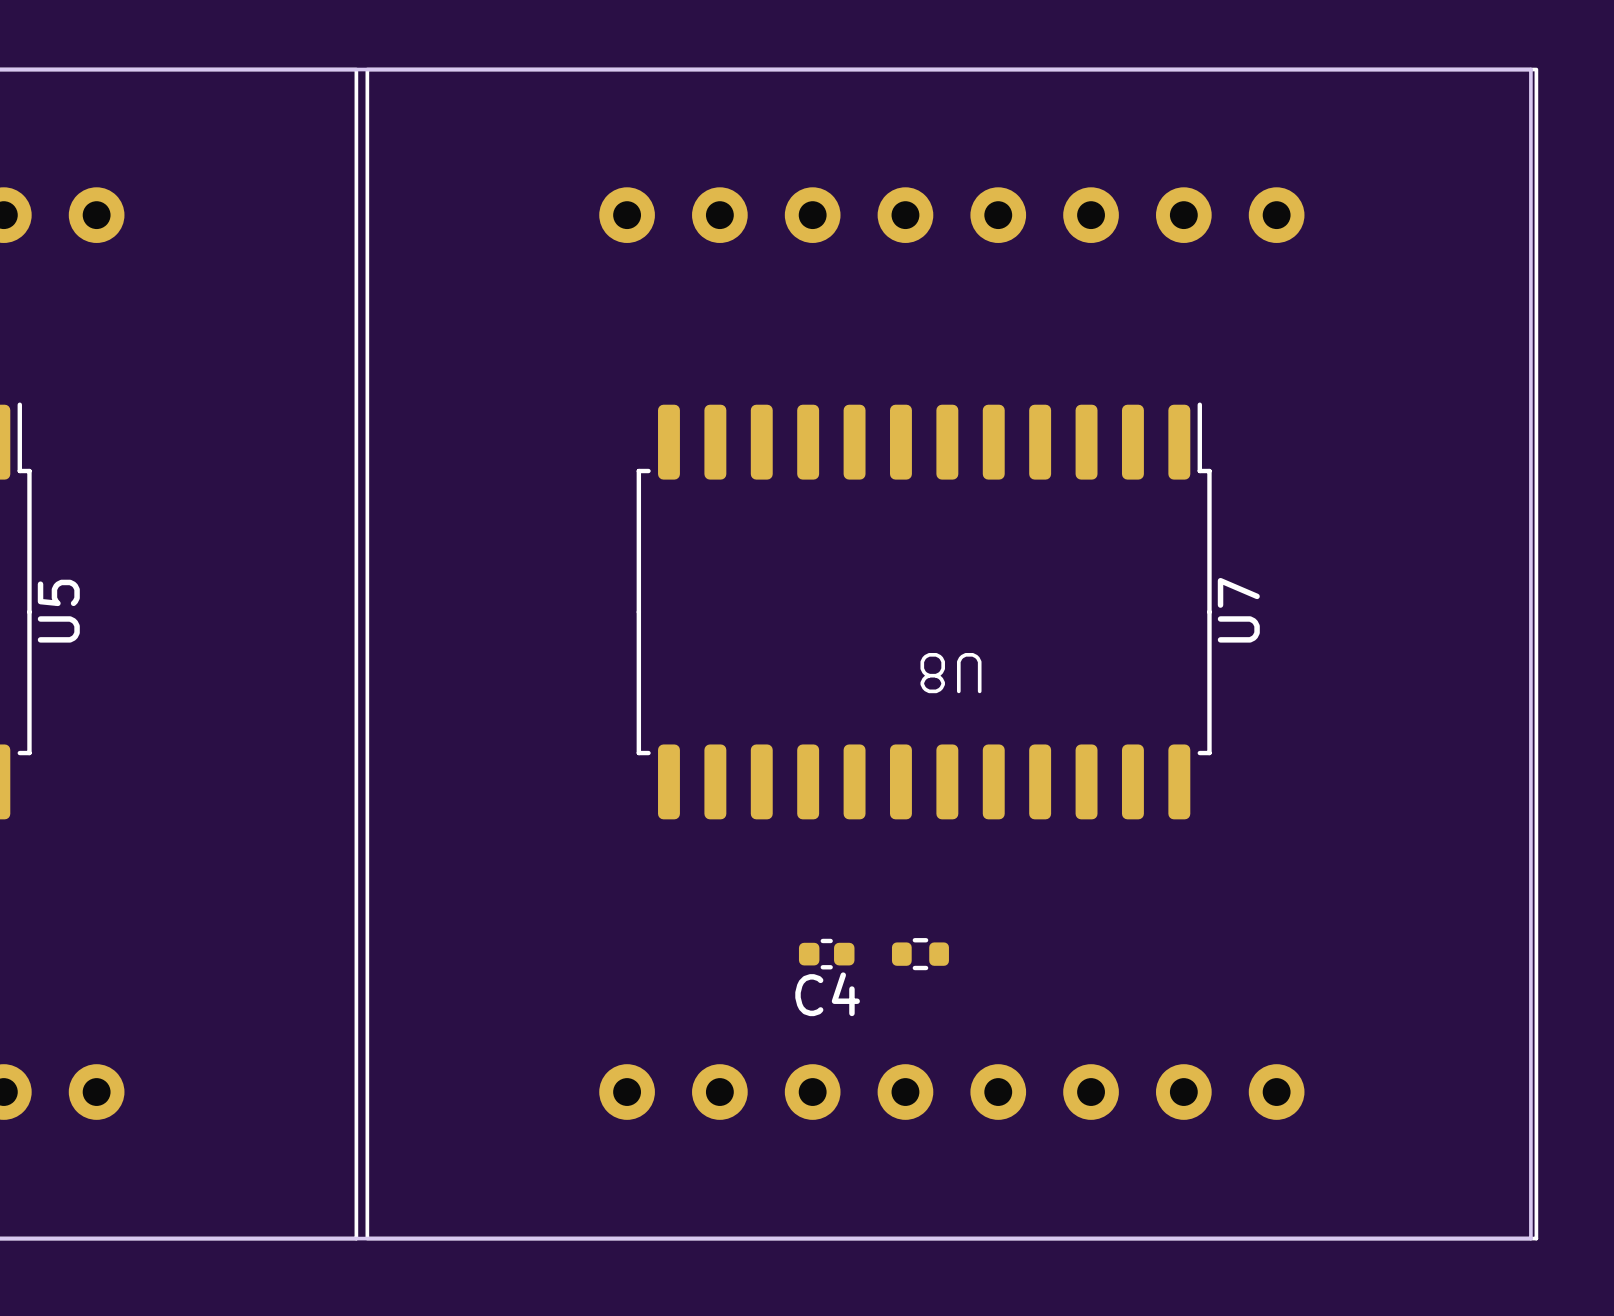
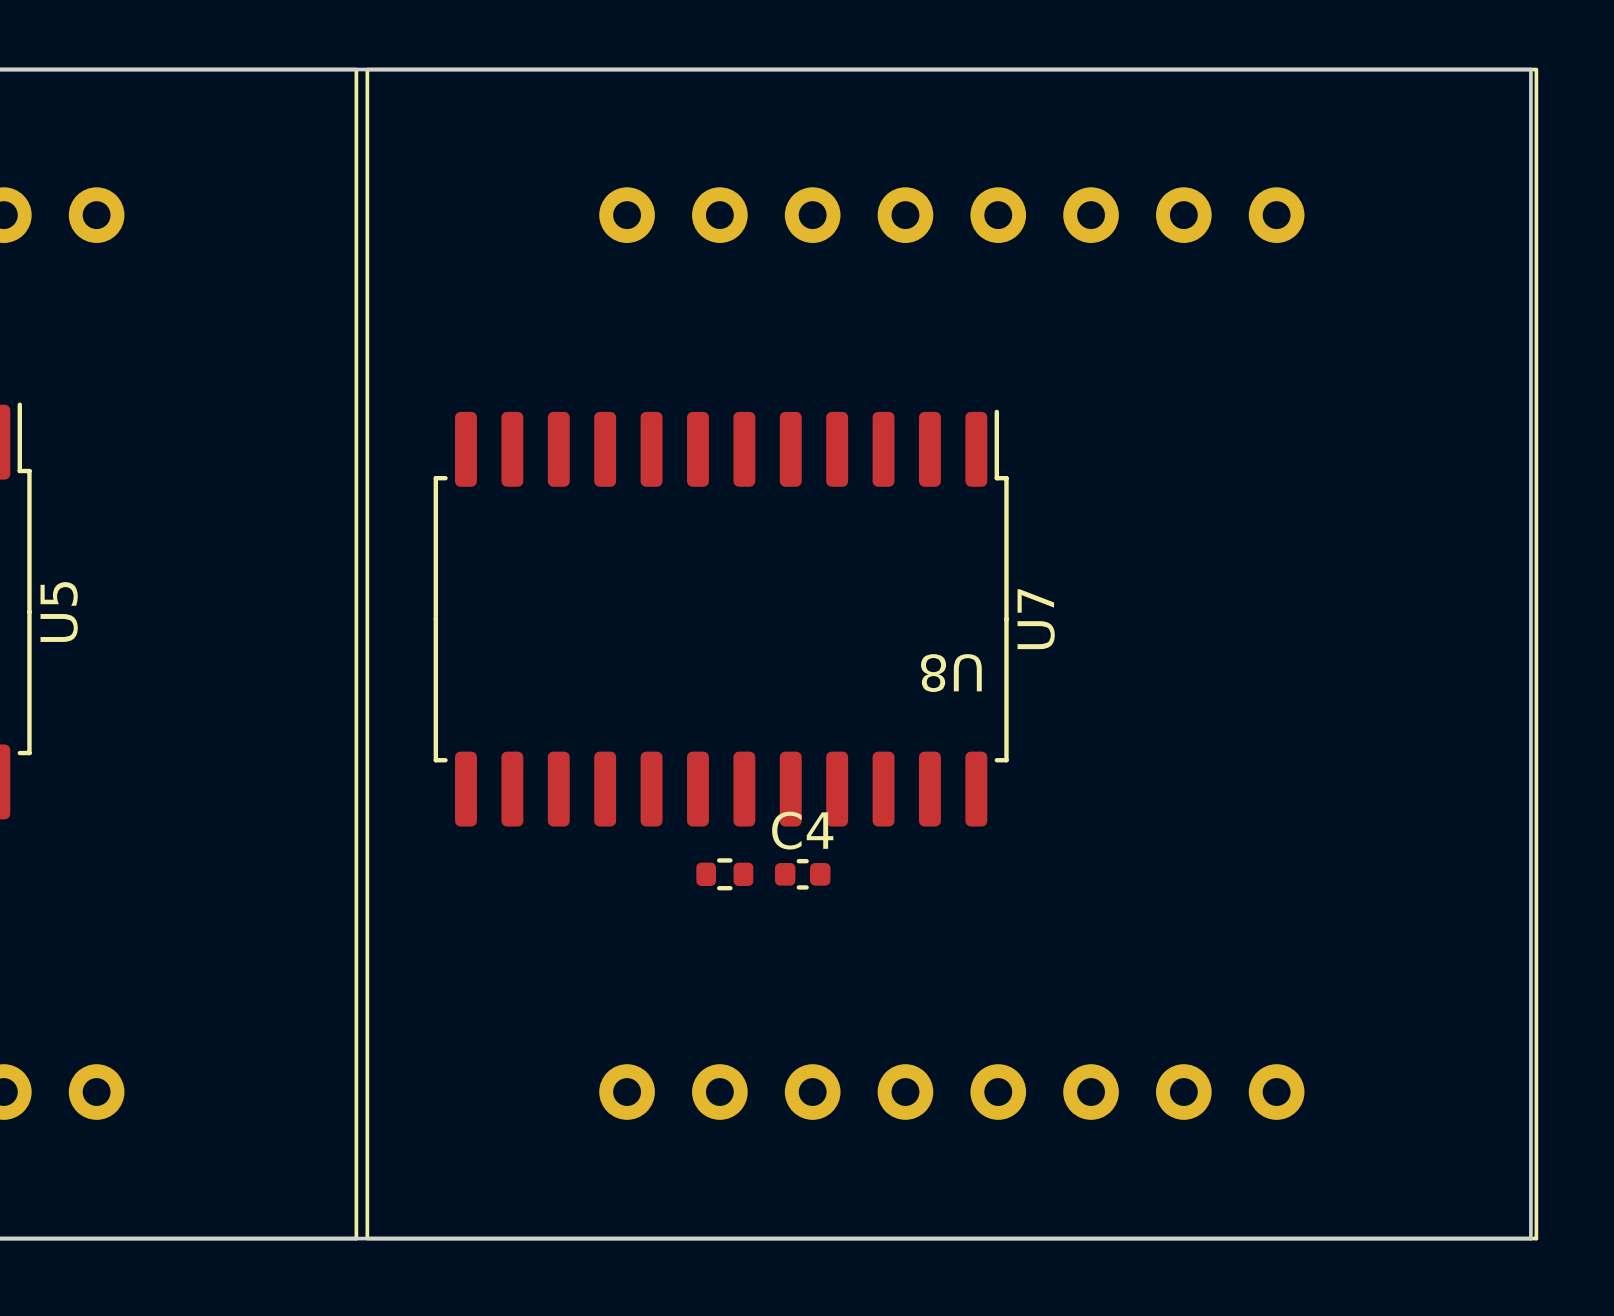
U7 position: (924, 610) -> (721, 618)
C4 position: (826, 954) -> (802, 874)
part position: (920, 954) -> (724, 874)
C4 name position: C4 (827, 994) -> C4 (802, 830)

